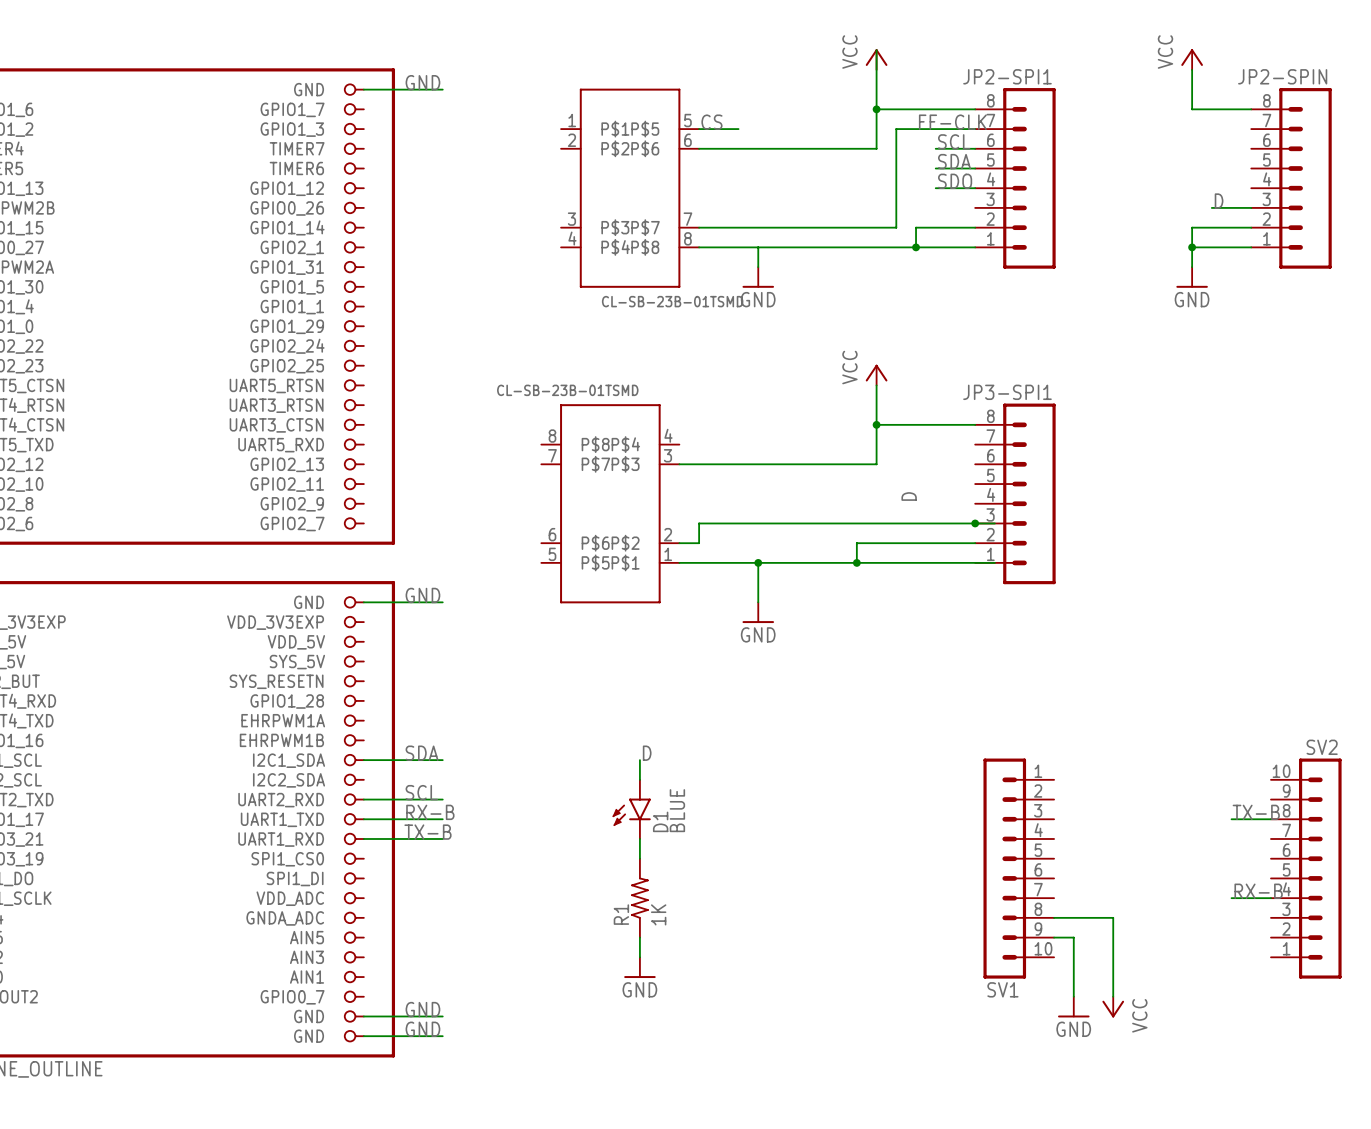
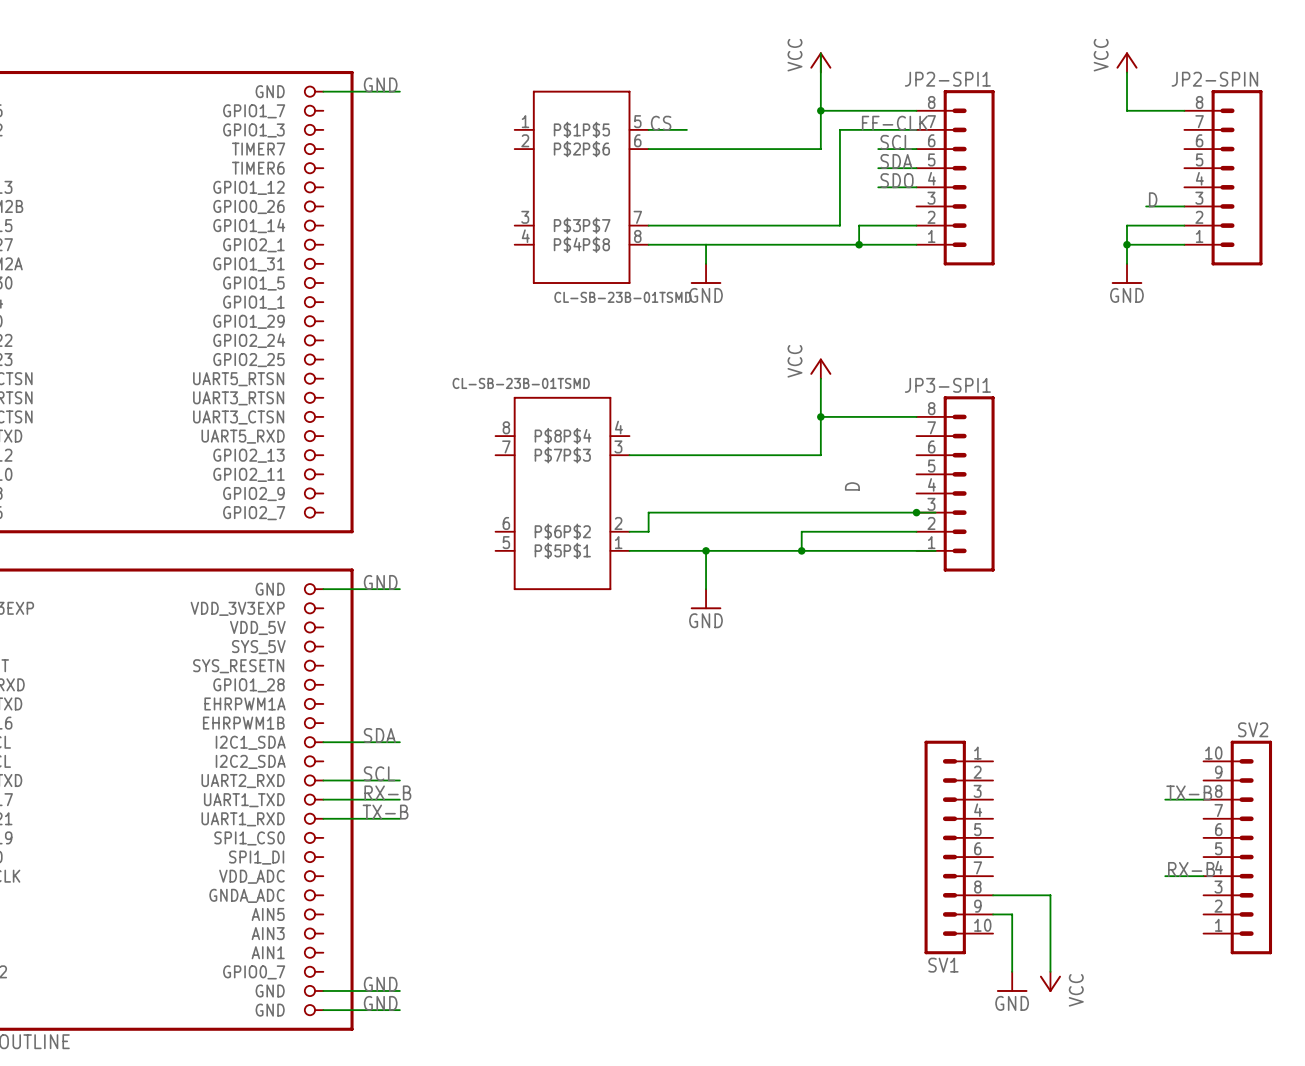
label: D (647, 753) -> none
wire: (639, 760) (639, 779) -> none
D1: BLUE (631, 809) -> none
wire: (639, 838) (639, 858) -> none
R1: 1K (639, 898) -> none
wire: (639, 937) (639, 957) -> none
power symbol: GND (639, 967) -> none

